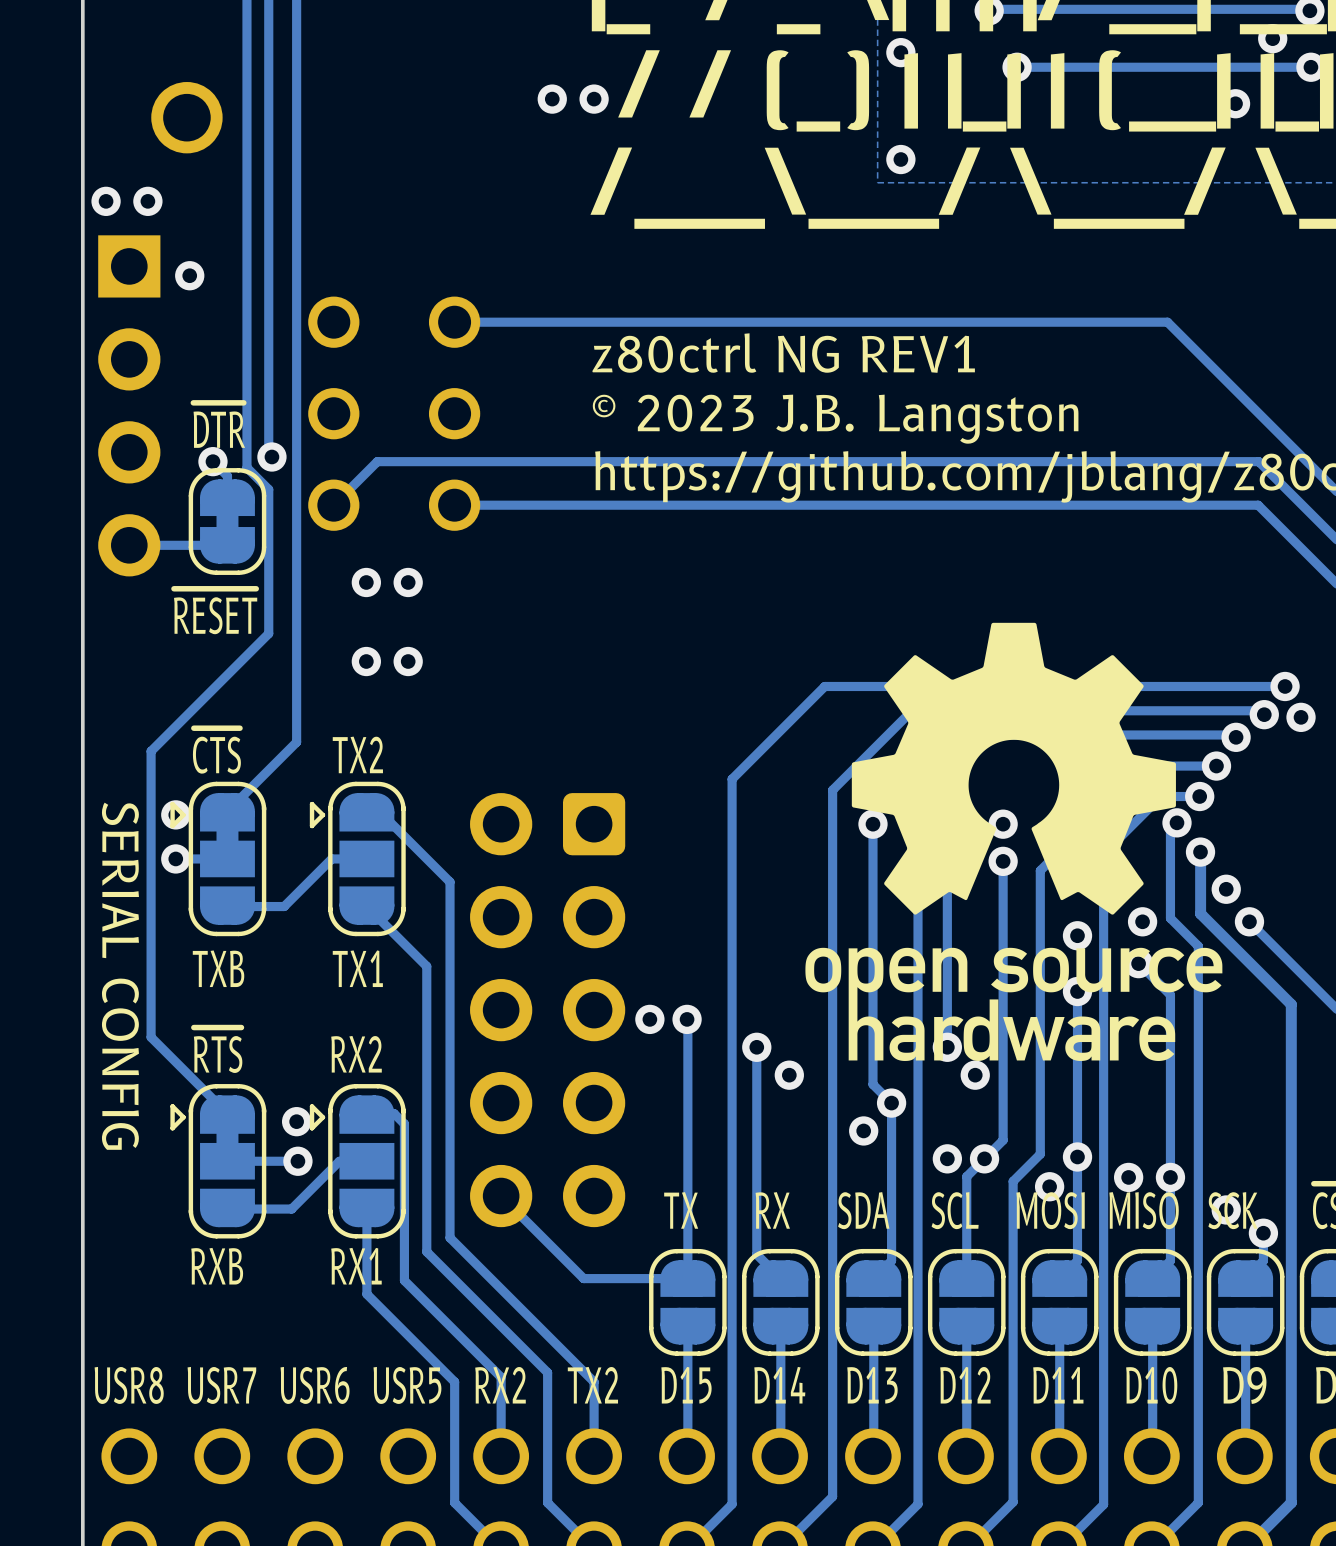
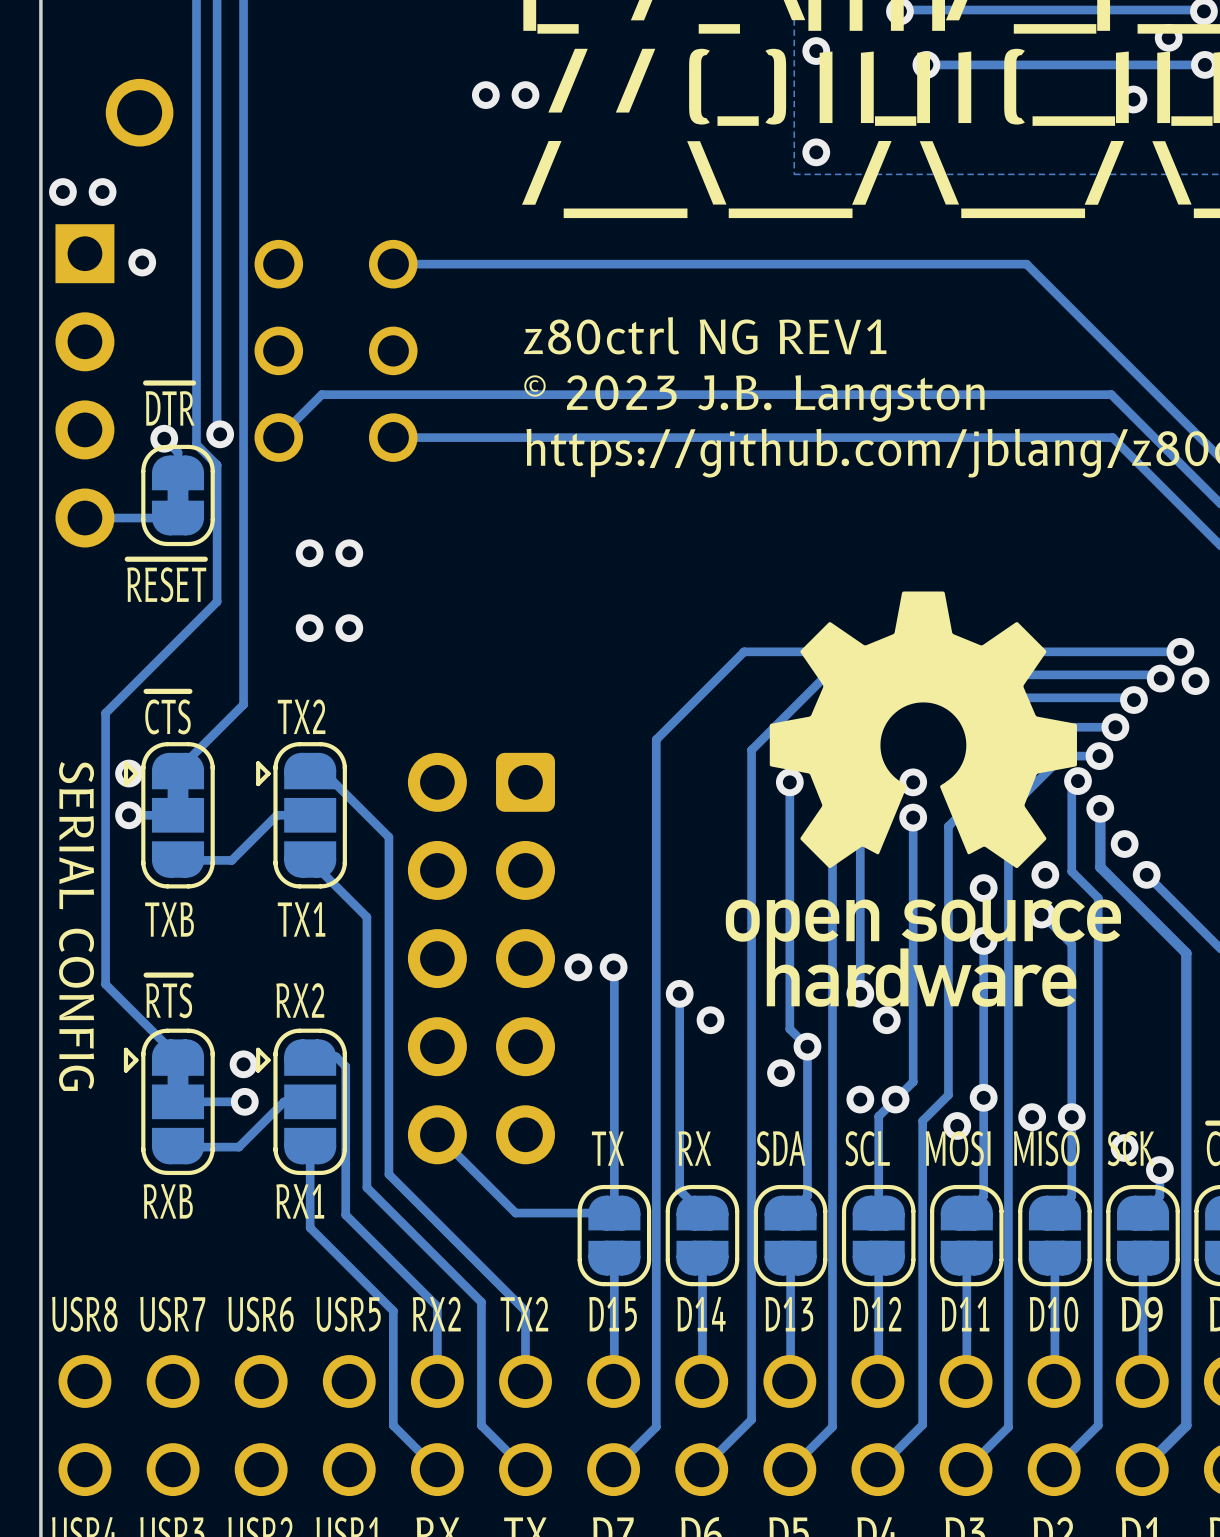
track: (1167, 322) (454, 322) -> (1069, 306) (1026, 264) (393, 264)
part position: (394, 413) -> (336, 350)
track: (1258, 461) (377, 461) (333, 505) -> (1155, 438) (1111, 394) (321, 394) (278, 437)
track: (1258, 505) (454, 505) -> (1154, 480) (1112, 437) (393, 437)

